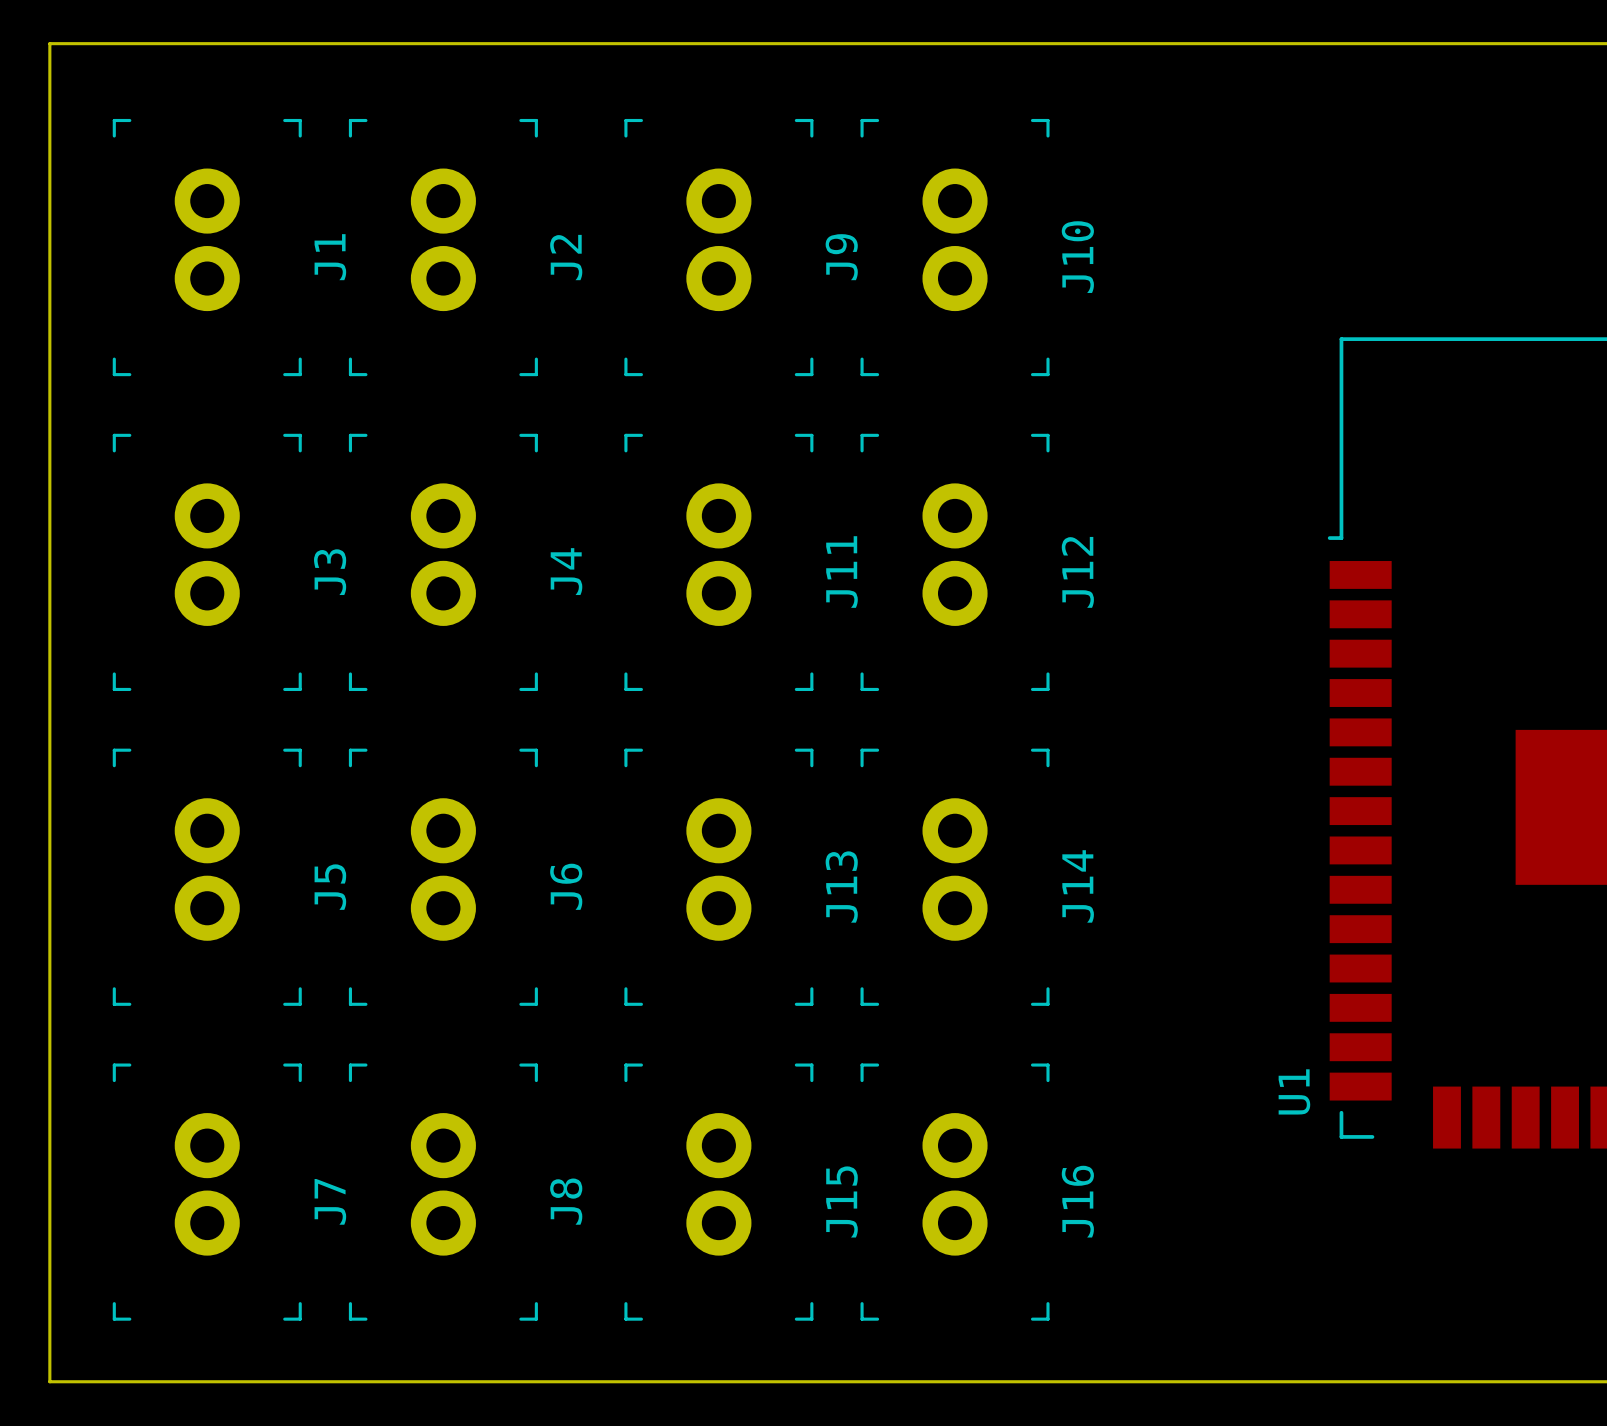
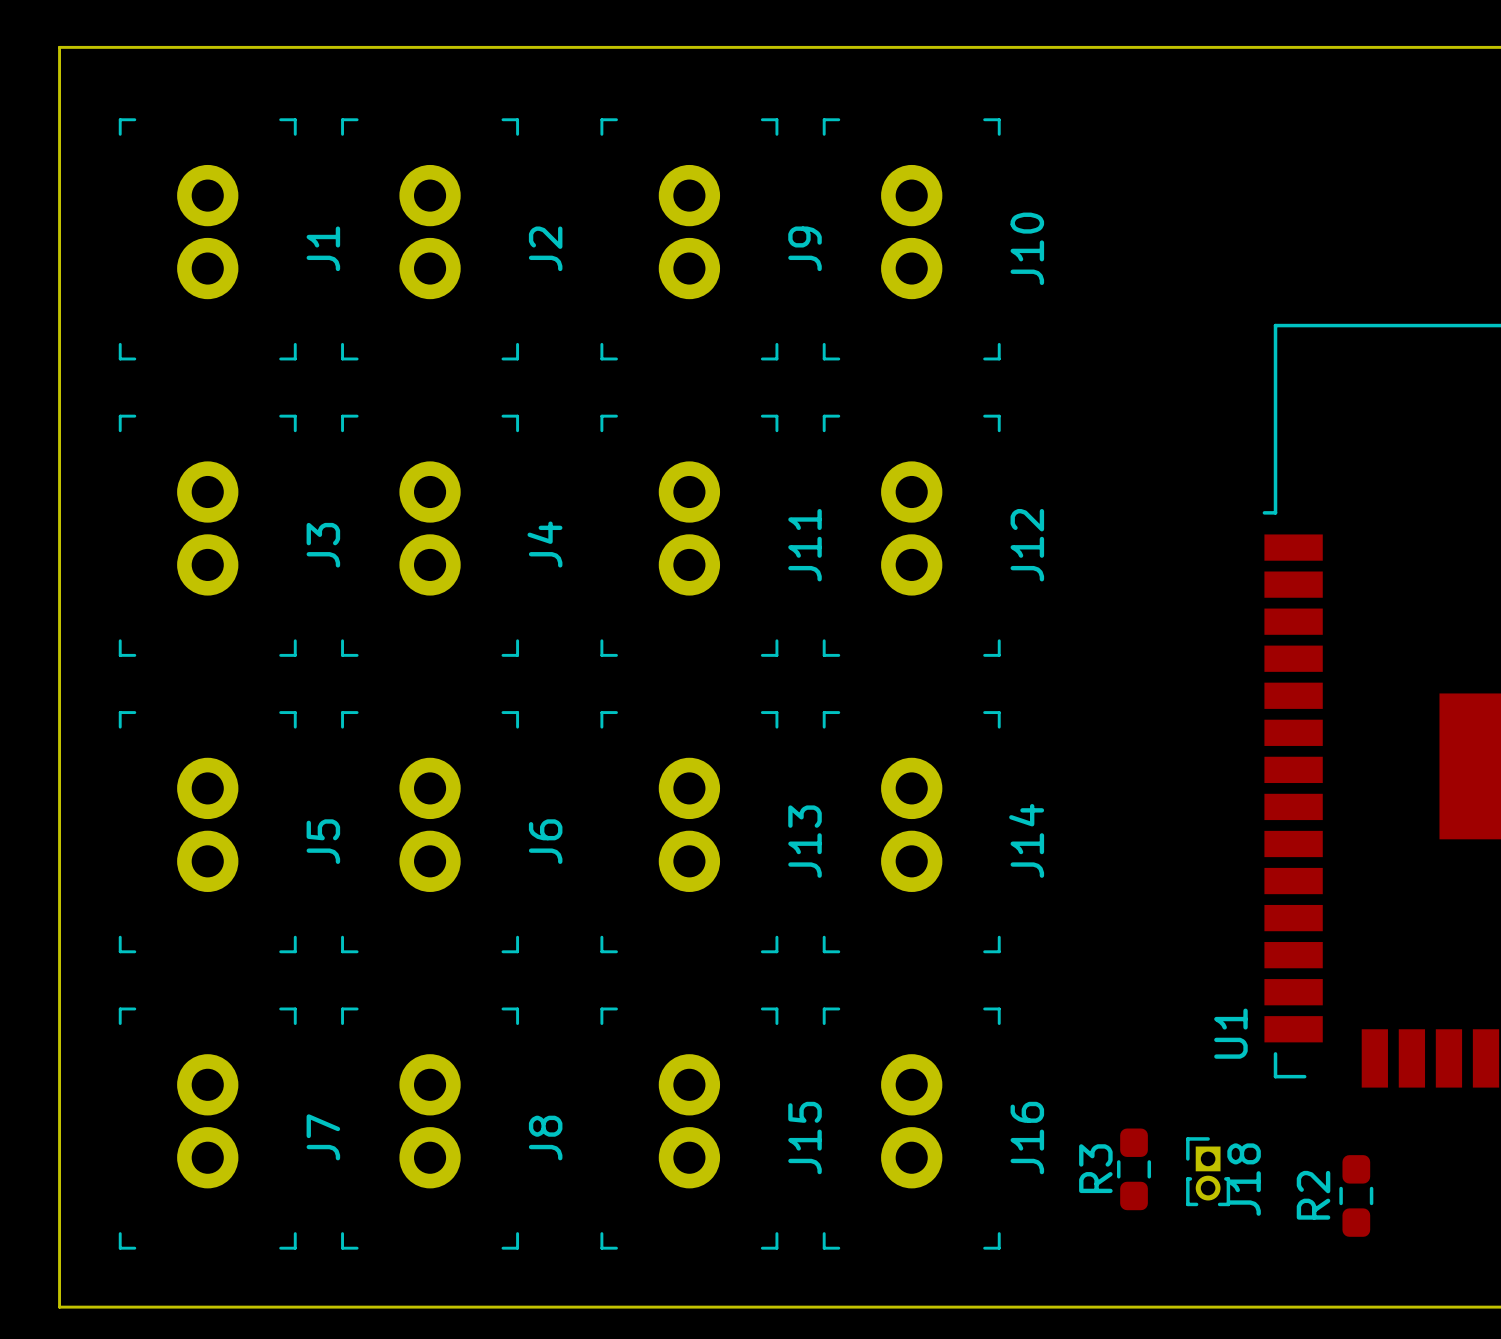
R3: none -> (1134, 1169)
J18: none -> (1208, 1171)
R2: none -> (1356, 1195)

